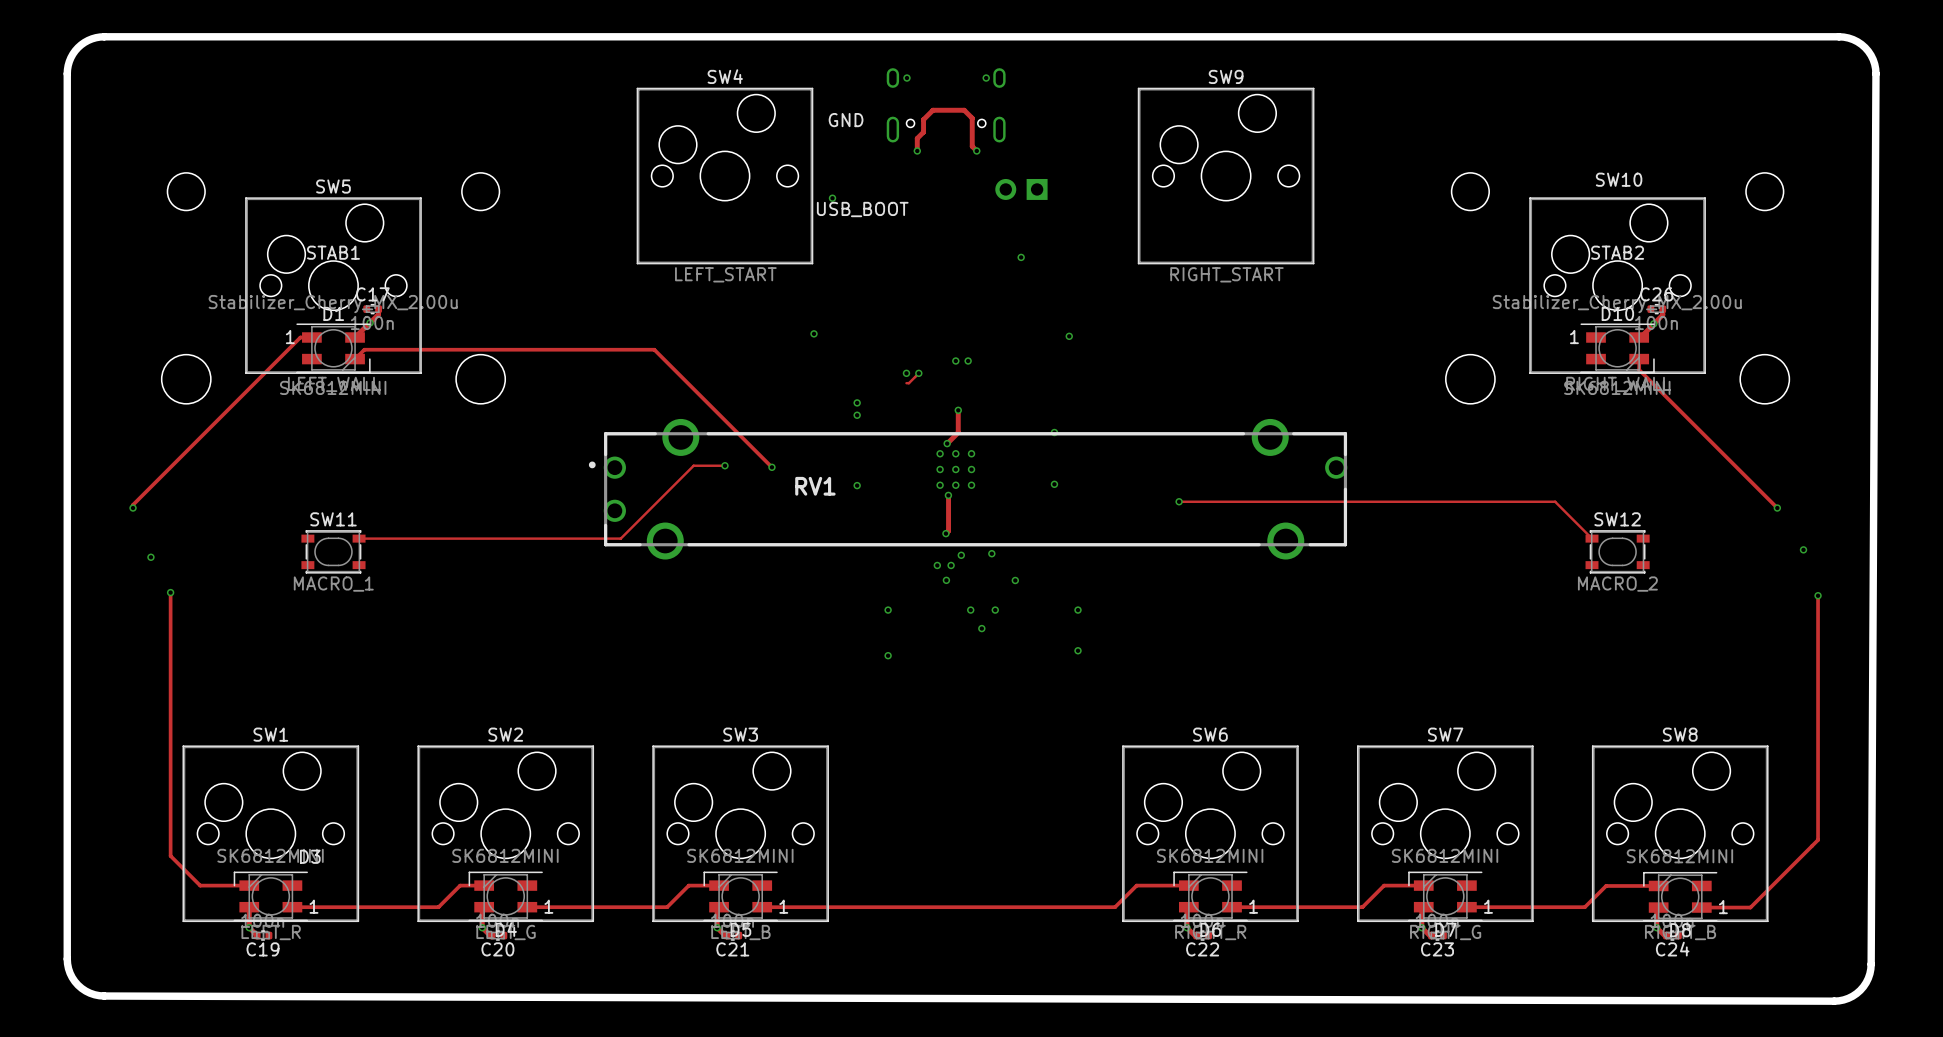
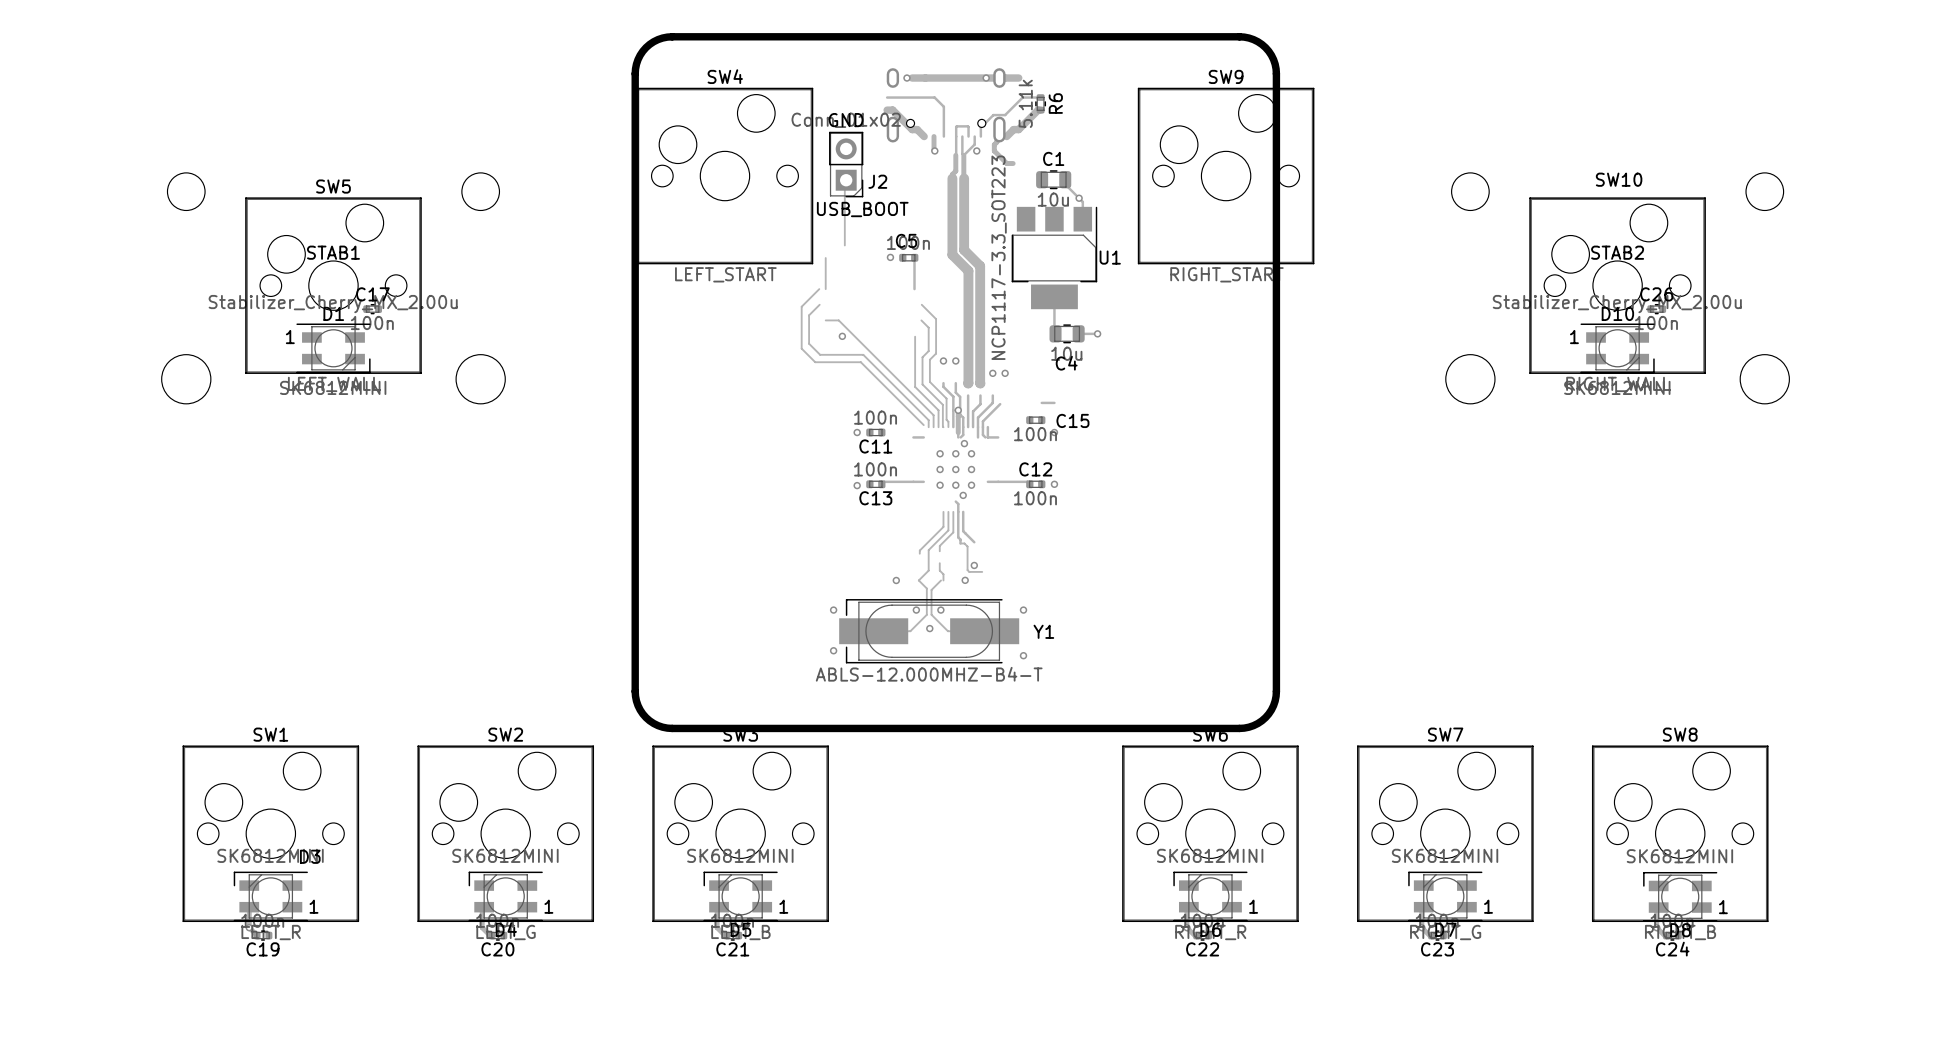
board edge: (672, 36) (104, 36) (88, 40) (72, 54) (67, 73) (67, 959) (72, 977) (81, 988) (94, 994) (104, 996) (1834, 1001) (1852, 996) (1866, 982) (1871, 964) (1875, 73) (1871, 55) (1857, 41) (1838, 36) (1239, 36) -> (672, 36) (658, 39) (646, 47) (638, 59) (635, 73) (635, 691) (638, 705) (646, 717) (658, 725) (672, 728) (1239, 728) (1257, 723) (1268, 713) (1273, 705) (1276, 691) (1276, 73) (1273, 59) (1265, 47) (1253, 39) (1239, 36)
track: none -> (912, 78) (1018, 78)
track: none -> (887, 97) (934, 97) (943, 106) (943, 136)
track: none -> (1040, 97) (1022, 97) (1005, 115) (993, 115) (980, 127) (980, 136)
R6: none -> 5.11k (1040, 103)
track: none -> (887, 110) (892, 110) (912, 129) (917, 129) (924, 136)
track: none -> (1040, 110) (1038, 110) (1018, 129) (1013, 129) (1006, 136)
track: none -> (934, 136) (934, 150)
track: none -> (962, 136) (963, 155)
track: none -> (968, 136) (967, 126) (956, 126) (955, 171) (952, 174) (952, 254) (968, 270) (968, 383)
track: none -> (974, 136) (974, 144) (963, 155)
track: none -> (996, 136) (994, 150) (1006, 163) (1013, 163)
track: (917, 150) (917, 138) (923, 132) (923, 119) (932, 110) (964, 110) (972, 118) (972, 146) (976, 150) -> none
via position: (917, 150) -> (934, 150)
track: none -> (963, 155) (964, 250) (980, 266) (980, 383)
C1: none -> 10u (1053, 179)
track: none -> (844, 181) (844, 245)
track: none -> (1065, 184) (1082, 201) (1082, 219)
J2 side: bottom (1021, 189) -> top (846, 164)
via: (832, 198) -> none
via: none -> (1079, 198)
via: none -> (890, 257)
C5: none -> 100n (908, 257)
via: (1021, 257) -> none
U1: none -> NCP1117-3.3_SOT223 (1054, 257)
track: none -> (825, 258) (825, 289)
track: none -> (914, 258) (914, 289)
track: none -> (819, 289) (801, 306) (801, 348) (815, 362) (860, 362) (923, 425)
track: none -> (1054, 296) (1054, 333)
track: none -> (819, 304) (809, 315) (809, 343) (820, 354) (863, 354) (928, 420) (928, 427)
track: none -> (921, 304) (936, 319) (936, 353) (929, 359) (929, 381) (946, 398) (948, 427)
track: (378, 309) (378, 314) (355, 337) -> none
track: (1662, 310) (1662, 314) (1639, 338) -> none
track: none -> (825, 320) (838, 320) (933, 415) (933, 427)
track: none -> (921, 320) (928, 327) (928, 351) (922, 357) (922, 384) (942, 404) (943, 427)
via: (370, 322) -> none
via: (1653, 323) -> none
via position: (814, 333) -> (842, 336)
C4: none -> 10u (1067, 333)
track: none -> (1079, 333) (1097, 333)
track: none -> (915, 336) (915, 386) (938, 410) (938, 427)
via position: (1069, 336) -> (1097, 333)
track: (311, 337) (300, 337) (133, 504) (133, 508) -> none
track: (355, 359) (364, 349) (654, 349) (771, 467) -> none
track: (1639, 359) (1639, 369) (1777, 508) -> none
via: none -> (943, 360)
via: (968, 360) -> none
via: (906, 373) -> none
track: (918, 373) (908, 383) (906, 383) -> none
via: (918, 373) -> none
via: none -> (992, 373)
via: none -> (1005, 373)
track: none -> (943, 383) (943, 386) (953, 396) (953, 427)
track: none -> (955, 383) (955, 392) (960, 396) (960, 414) (963, 417) (963, 434) (960, 437)
track: none -> (968, 395) (968, 427)
track: none -> (980, 395) (980, 404) (973, 411) (973, 427)
track: none -> (992, 395) (992, 402) (978, 417) (978, 437)
via: (857, 402) -> none
track: none -> (1041, 402) (1054, 402)
track: none -> (1000, 404) (982, 421) (982, 434) (985, 437)
via: (857, 415) -> none
C15: none -> 100n (1035, 420)
track: none -> (987, 427) (987, 437) (998, 437)
via: none -> (857, 432)
C11: none -> 100n (875, 432)
track: (958, 432) (947, 443) -> (958, 432) (958, 437)
track: none -> (913, 437) (923, 437)
via position: (947, 443) -> (964, 443)
track: (724, 465) (693, 465) (620, 538) (359, 538) -> none
via: (724, 465) -> none
via: (771, 467) -> none
track: none -> (923, 481) (884, 481) (881, 484)
track: none -> (987, 481) (1027, 481) (1029, 484)
C13: none -> 100n (875, 484)
C12: none -> 100n (1035, 484)
RV1: (968, 489) -> none
track: (948, 495) (948, 531) (945, 533) -> none
via position: (948, 495) -> (963, 495)
track: none -> (955, 501) (958, 504) (958, 537) (960, 543) (964, 543) (967, 546) (967, 570) (969, 571) (982, 571)
track: (1179, 501) (1555, 501) (1592, 538) -> none
via: (1179, 501) -> none
via: (133, 508) -> none
via: (1777, 508) -> none
track: none -> (943, 511) (943, 526) (919, 550) (919, 553)
track: none -> (948, 511) (948, 530) (928, 550) (928, 570) (918, 580) (926, 588) (926, 614) (910, 631) (873, 631)
track: none -> (953, 511) (953, 532) (939, 545) (939, 551)
track: none -> (963, 511) (963, 531) (974, 542)
via: (945, 533) -> none
via: (1803, 549) -> none
SW11: MACRO_1 (333, 551) -> none
SW12: MACRO_2 (1617, 551) -> none
via: (991, 553) -> none
via: (961, 555) -> none
via: (150, 557) -> none
track: none -> (939, 563) (939, 570) (943, 574) (943, 580)
via: (937, 565) -> none
via: (951, 565) -> none
via: none -> (974, 565)
via: none -> (896, 580)
track: none -> (941, 580) (931, 589) (931, 614) (947, 631) (984, 631)
via: (946, 580) -> none
via: none -> (965, 580)
via: (1015, 580) -> none
track: (170, 592) (170, 855) (200, 885) (249, 885) -> none
via: (170, 592) -> none
track: (1818, 595) (1818, 840) (1750, 907) (1701, 907) -> none
via: (1818, 595) -> none
via: none -> (833, 610)
via: (888, 610) -> none
via: none -> (916, 610)
via: none -> (940, 610)
via: (970, 610) -> none
via: (995, 610) -> none
via: none -> (1023, 610)
via: (1078, 610) -> none
via: none -> (929, 628)
via: (981, 628) -> none
Y1: none -> ABLS-12.000MHZ-B4-T (929, 631)
via: none -> (833, 650)
via: (1078, 650) -> none
via: (888, 655) -> none
via: none -> (1023, 655)
track: (484, 885) (460, 885) (438, 907) (292, 907) -> none
track: (719, 885) (688, 885) (667, 907) (527, 907) -> none
track: (1188, 885) (1136, 885) (1115, 907) (762, 907) -> none
track: (1423, 885) (1384, 885) (1362, 907) (1232, 907) -> none
track: (1658, 885) (1606, 885) (1584, 907) (1466, 907) -> none
via: (482, 927) -> none
via: (717, 927) -> none

